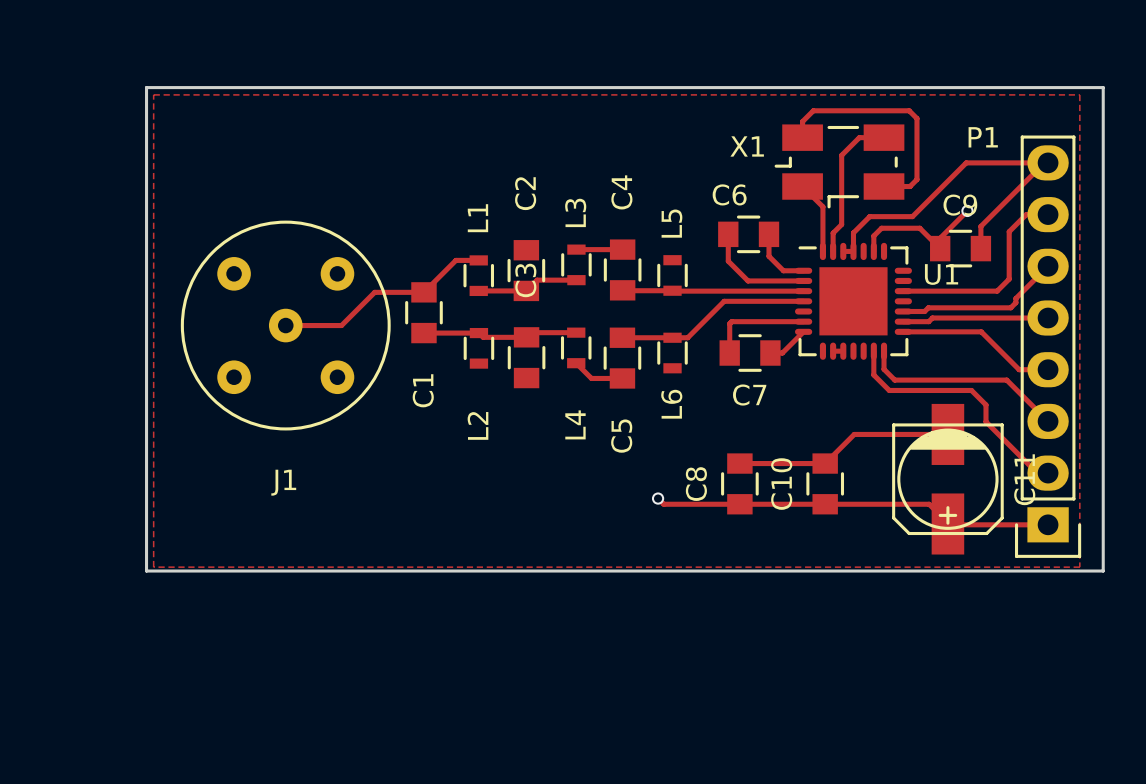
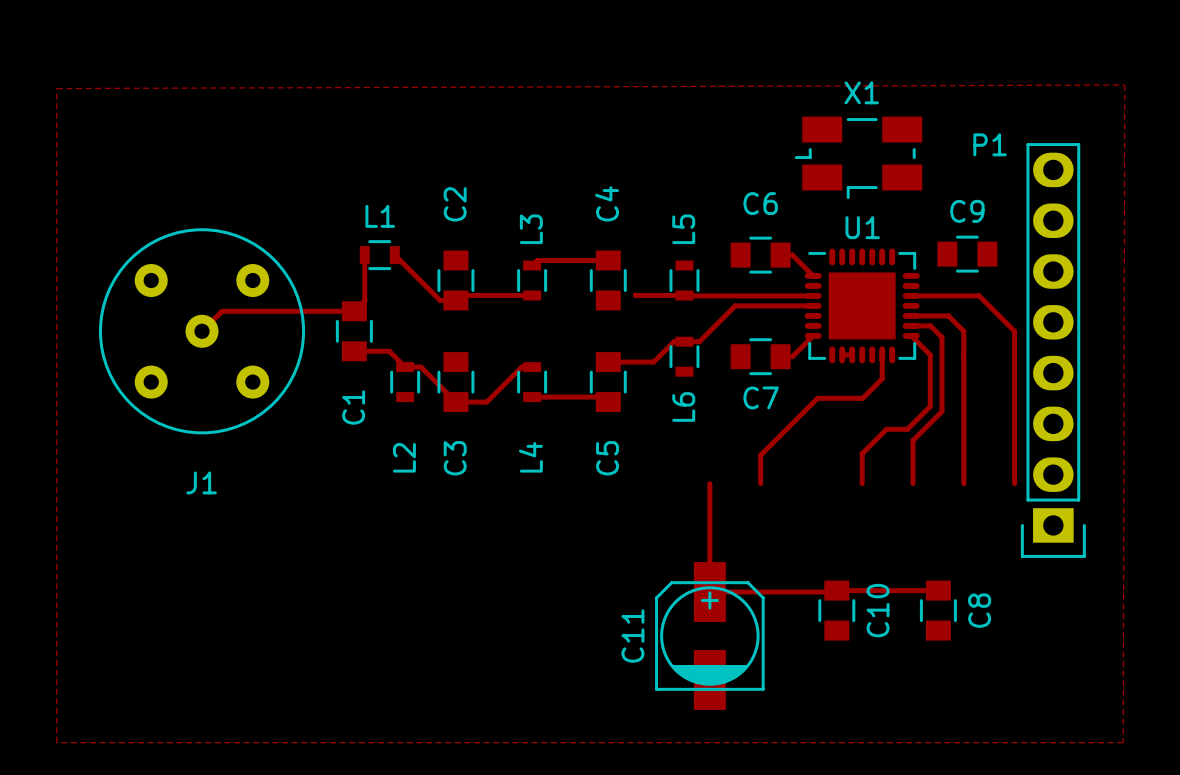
board edge: (146, 87) (1103, 87) (1103, 571) (146, 571) (146, 87) -> none
zone outline: (153, 94) (153, 567) (1079, 567) (1079, 94) (153, 94) -> (1124, 84) (56, 88) (56, 742) (1123, 742) (1124, 84)
track: (802, 137) (802, 121) (813, 110) (909, 110) (916, 118) (916, 179) (910, 186) (884, 186) -> none
track: (884, 137) (859, 137) (841, 155) (841, 224) (833, 233) (833, 251) -> none
X1 name position: X1 (747, 146) -> X1 (861, 92)
track: (1044, 162) (980, 226) (980, 248) -> none
track: (1048, 162) (966, 162) (912, 216) (869, 216) (853, 232) (853, 251) (843, 251) -> none
X1 position: (839, 166) -> (858, 157)
track: (802, 186) (822, 206) (822, 251) -> none
C6 name position: C6 (729, 194) -> C6 (760, 203)
track: (967, 210) (940, 238) (940, 248) (919, 228) (881, 228) (873, 235) (873, 251) -> none
via: (967, 210) -> none
track: (1048, 214) (1026, 214) (1009, 231) (1009, 279) (997, 291) (972, 291) -> (1014, 483) (1014, 331) (979, 295)
track: (728, 234) (728, 261) (748, 280) (803, 280) -> none
C6 position: (748, 234) -> (760, 255)
track: (769, 234) (769, 256) (783, 270) (803, 270) -> (780, 255) (792, 255) (813, 275)
track: none -> (364, 255) (364, 300) (354, 311) (222, 311) (202, 331)
track: none -> (394, 255) (440, 300) (455, 300) (460, 295) (532, 295)
track: (576, 249) (622, 249) -> none
track: none -> (608, 260) (537, 260) (532, 265)
track: (478, 260) (455, 260) (423, 292) (374, 292) (341, 325) (285, 325) -> none
L3 position: (576, 264) -> (532, 280)
track: (1048, 266) (1015, 298) (1015, 302) (1010, 307) (928, 307) (924, 311) -> (963, 483) (963, 331) (948, 315) (932, 315)
C4 position: (622, 269) -> (608, 280)
C2 position: (526, 270) -> (455, 280)
U1 name position: U1 (941, 274) -> U1 (862, 227)
L1 rotation: 0° (478, 275) -> 90° clockwise (379, 255)
L1 position: (478, 275) -> (379, 255)
C3 name position: C3 (525, 280) -> C3 (455, 458)
track: (576, 280) (537, 280) (526, 290) (478, 290) -> none
C1 position: (423, 312) -> (354, 331)
track: (1048, 318) (932, 318) (928, 321) (922, 321) -> (913, 483) (913, 440) (941, 411) (941, 337) (930, 325)
track: (803, 321) (731, 321) (729, 323) (729, 353) -> none
J1 position: (285, 325) -> (202, 331)
track: (903, 331) (981, 331) (1019, 369) (1048, 369) -> (911, 335) (930, 354) (930, 406) (907, 429) (886, 429) (862, 453) (862, 483)
track: (576, 332) (531, 332) (526, 337) (483, 337) (478, 333) (423, 333) -> none
track: (622, 337) (661, 337) -> (608, 362) (653, 362) (674, 341)
track: none -> (354, 351) (389, 351) (405, 367) (420, 367) (455, 402) (486, 402) (521, 367) (532, 367)
L4 position: (576, 347) -> (532, 382)
L2 position: (478, 348) -> (405, 382)
track: (884, 351) (884, 369) (894, 380) (1006, 380) (1048, 421) -> none
C3 position: (526, 357) -> (455, 382)
C5 position: (622, 358) -> (608, 382)
track: (576, 363) (591, 378) (622, 378) -> none
track: (873, 375) (889, 390) (971, 390) (985, 404) (985, 421) (1037, 473) (1048, 473) -> (882, 378) (862, 398) (817, 398) (760, 455) (760, 483)
track: none -> (532, 397) (603, 397) (608, 402)
track: (947, 434) (854, 434) (825, 463) (739, 463) -> none
C11 rotation: 0° (947, 479) -> 180° (709, 636)
C11 position: (947, 479) -> (709, 636)
track: none -> (709, 483) (709, 592) (938, 590)
C8 position: (739, 483) -> (938, 610)
C10 position: (825, 483) -> (836, 610)
C8 name position: C8 (696, 484) -> C8 (979, 610)
C10 name position: C10 (781, 484) -> C10 (878, 610)
track: (658, 498) (663, 504) (929, 504) (947, 523) -> none
via: (658, 498) -> none
track: (948, 524) (1048, 524) -> none

